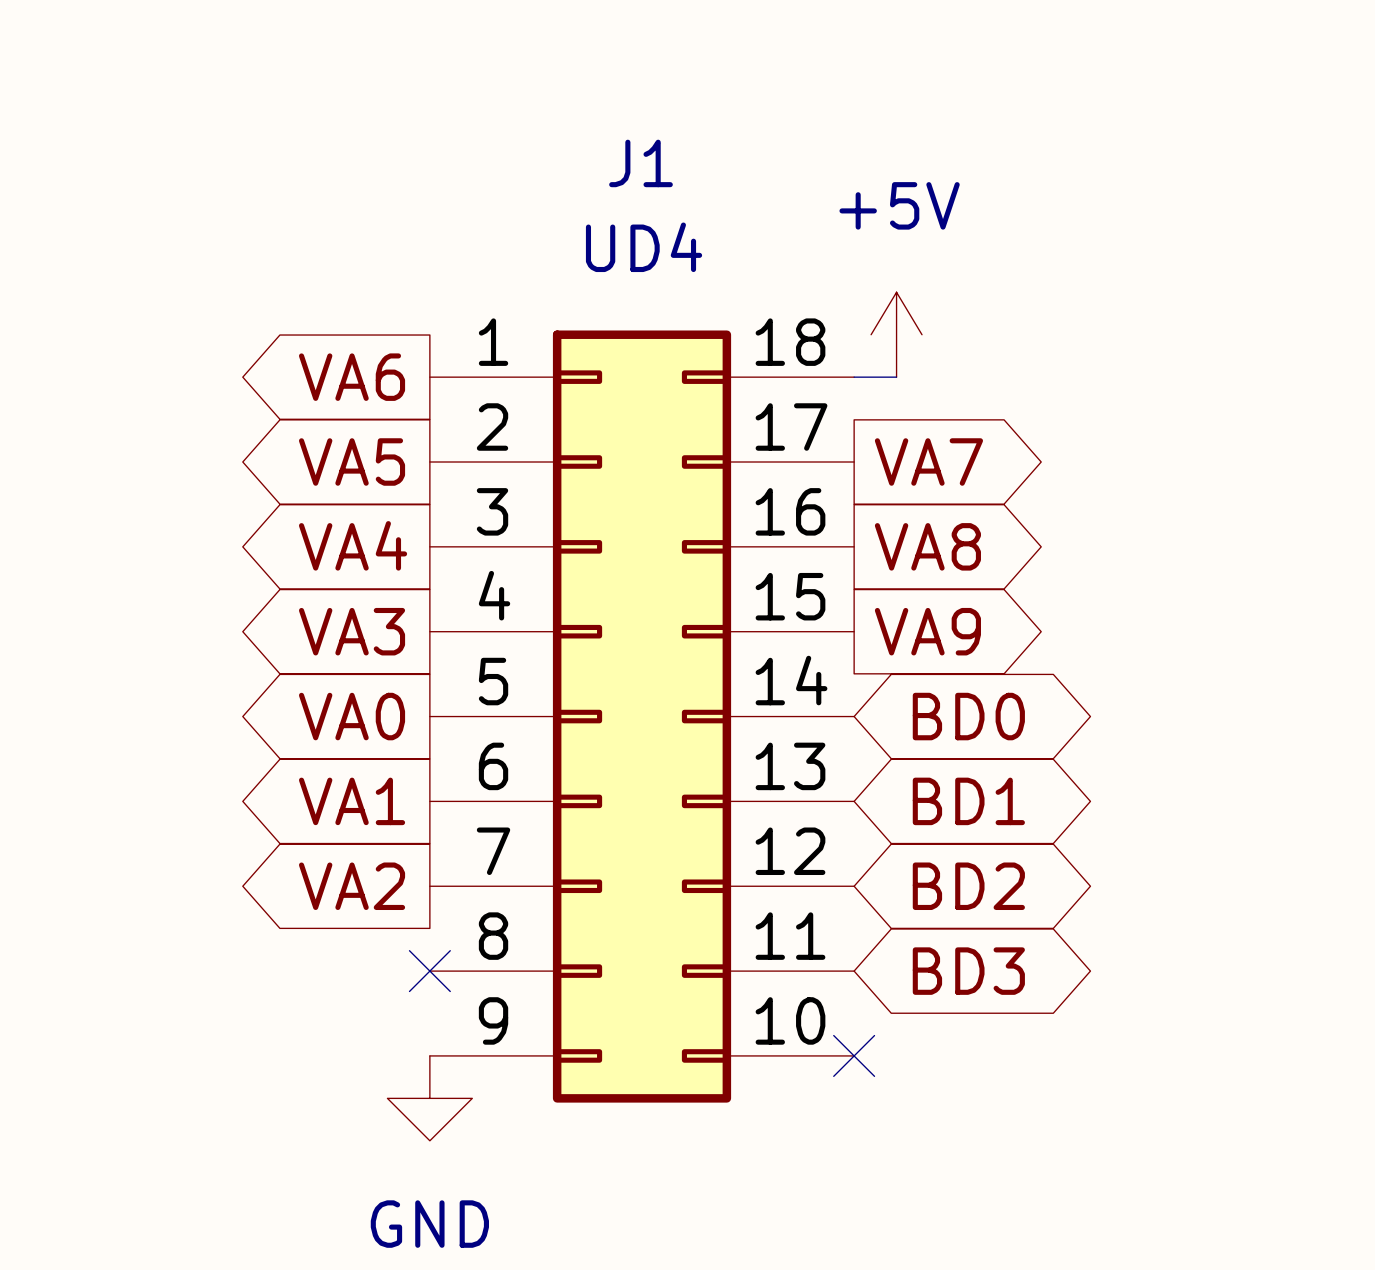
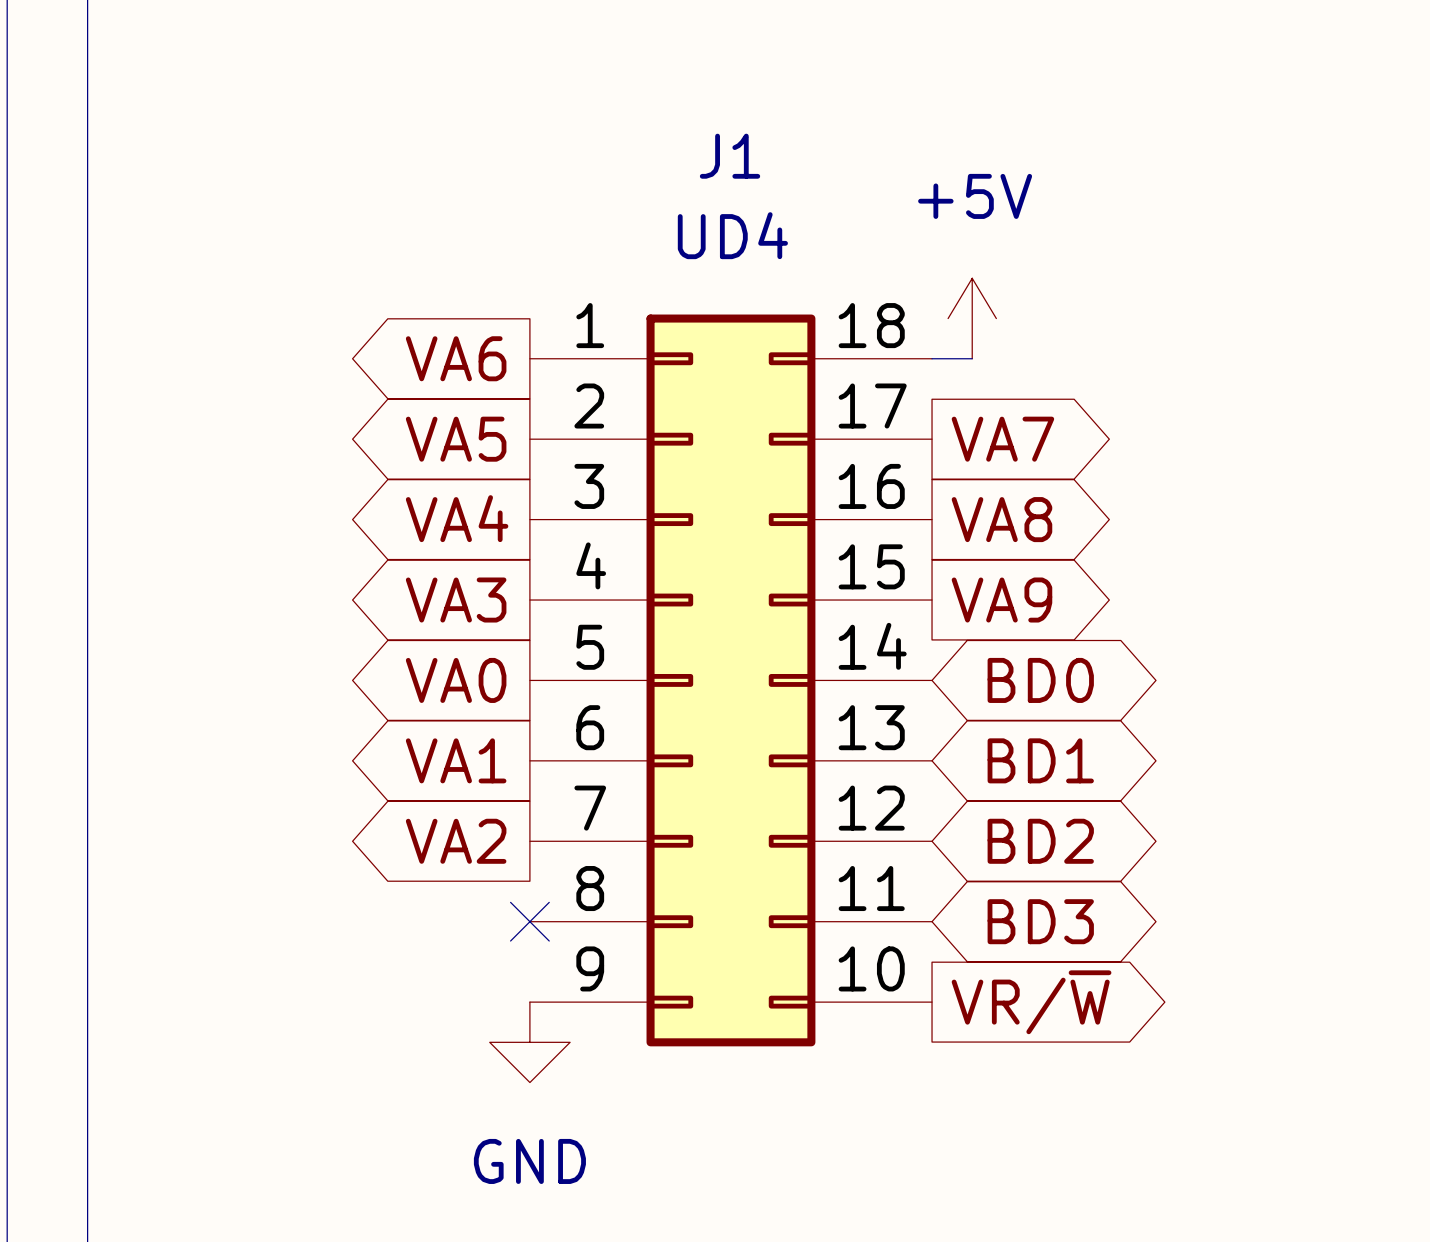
no-connect mark: (854, 1055) -> none
global label: none -> VR/~{W} (1031, 1002)

